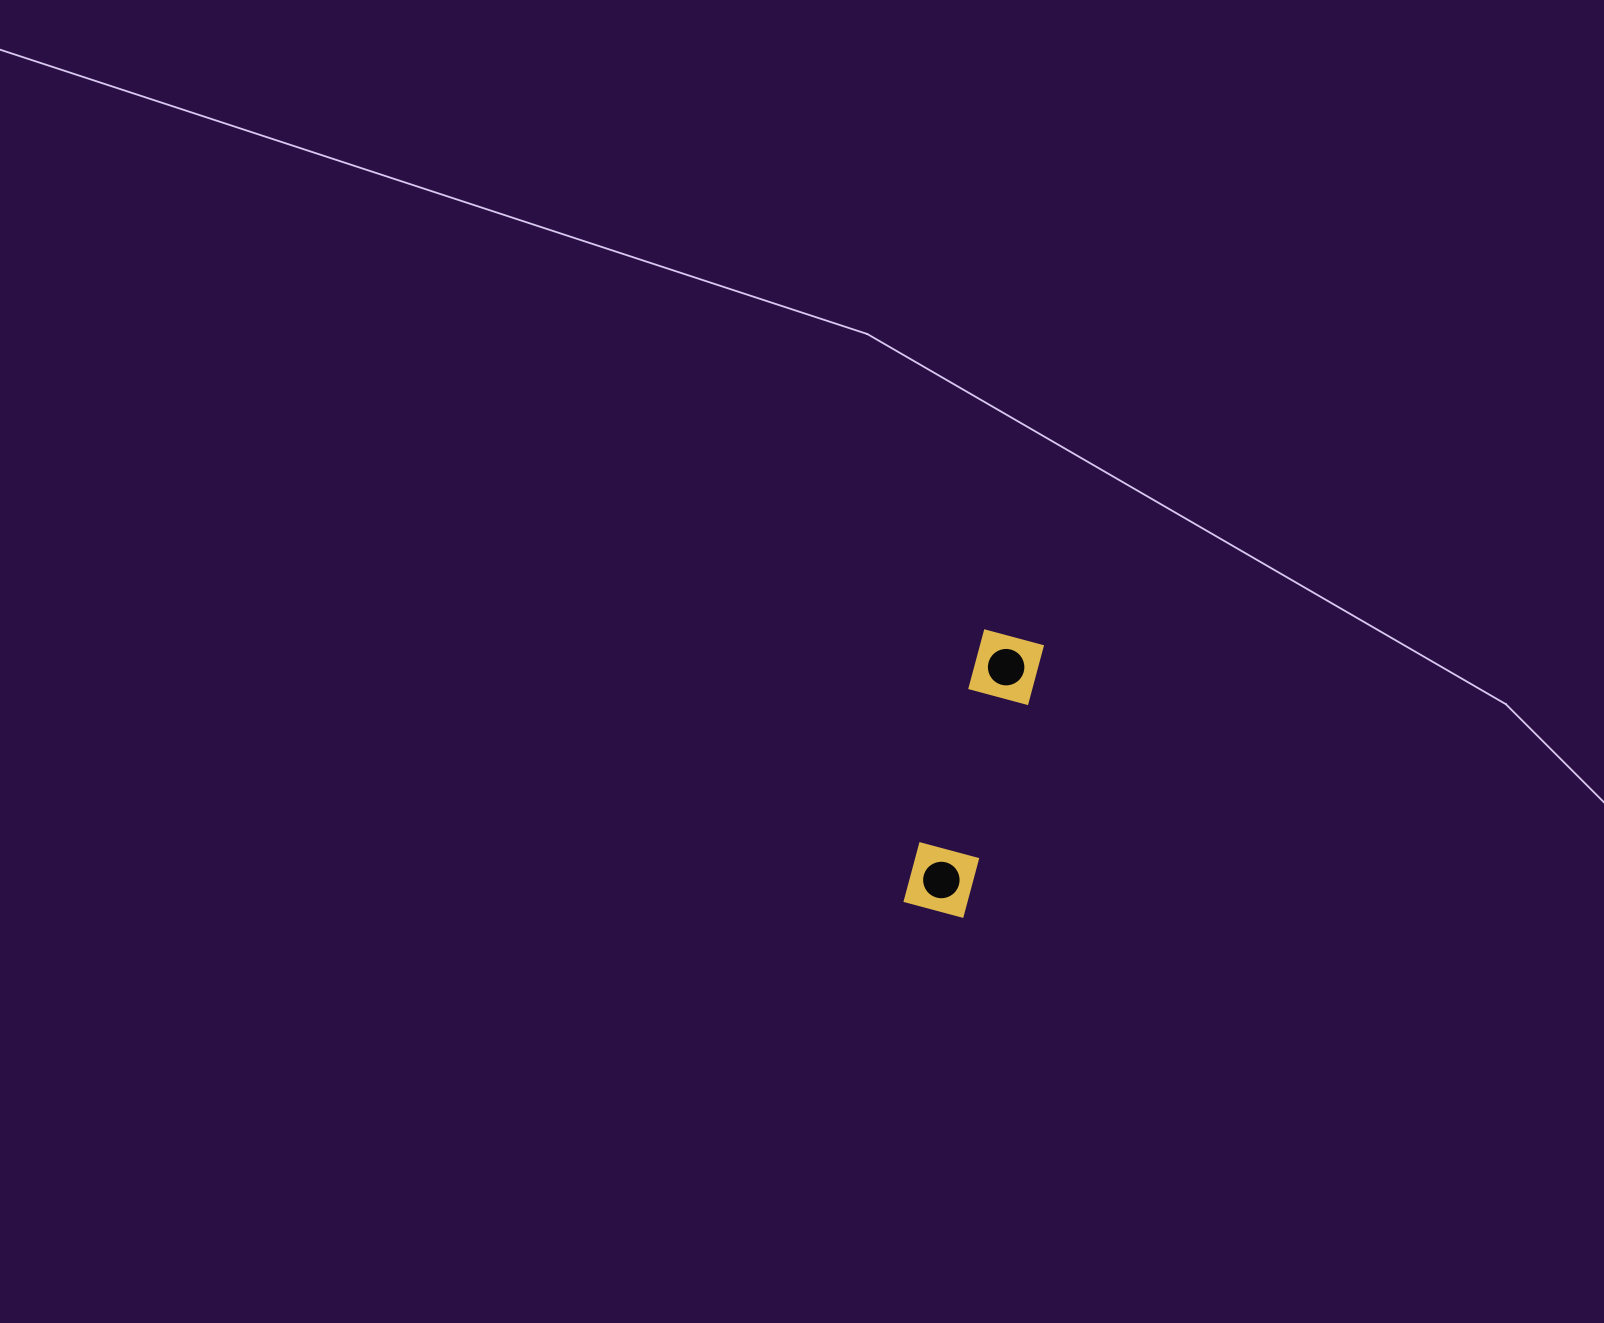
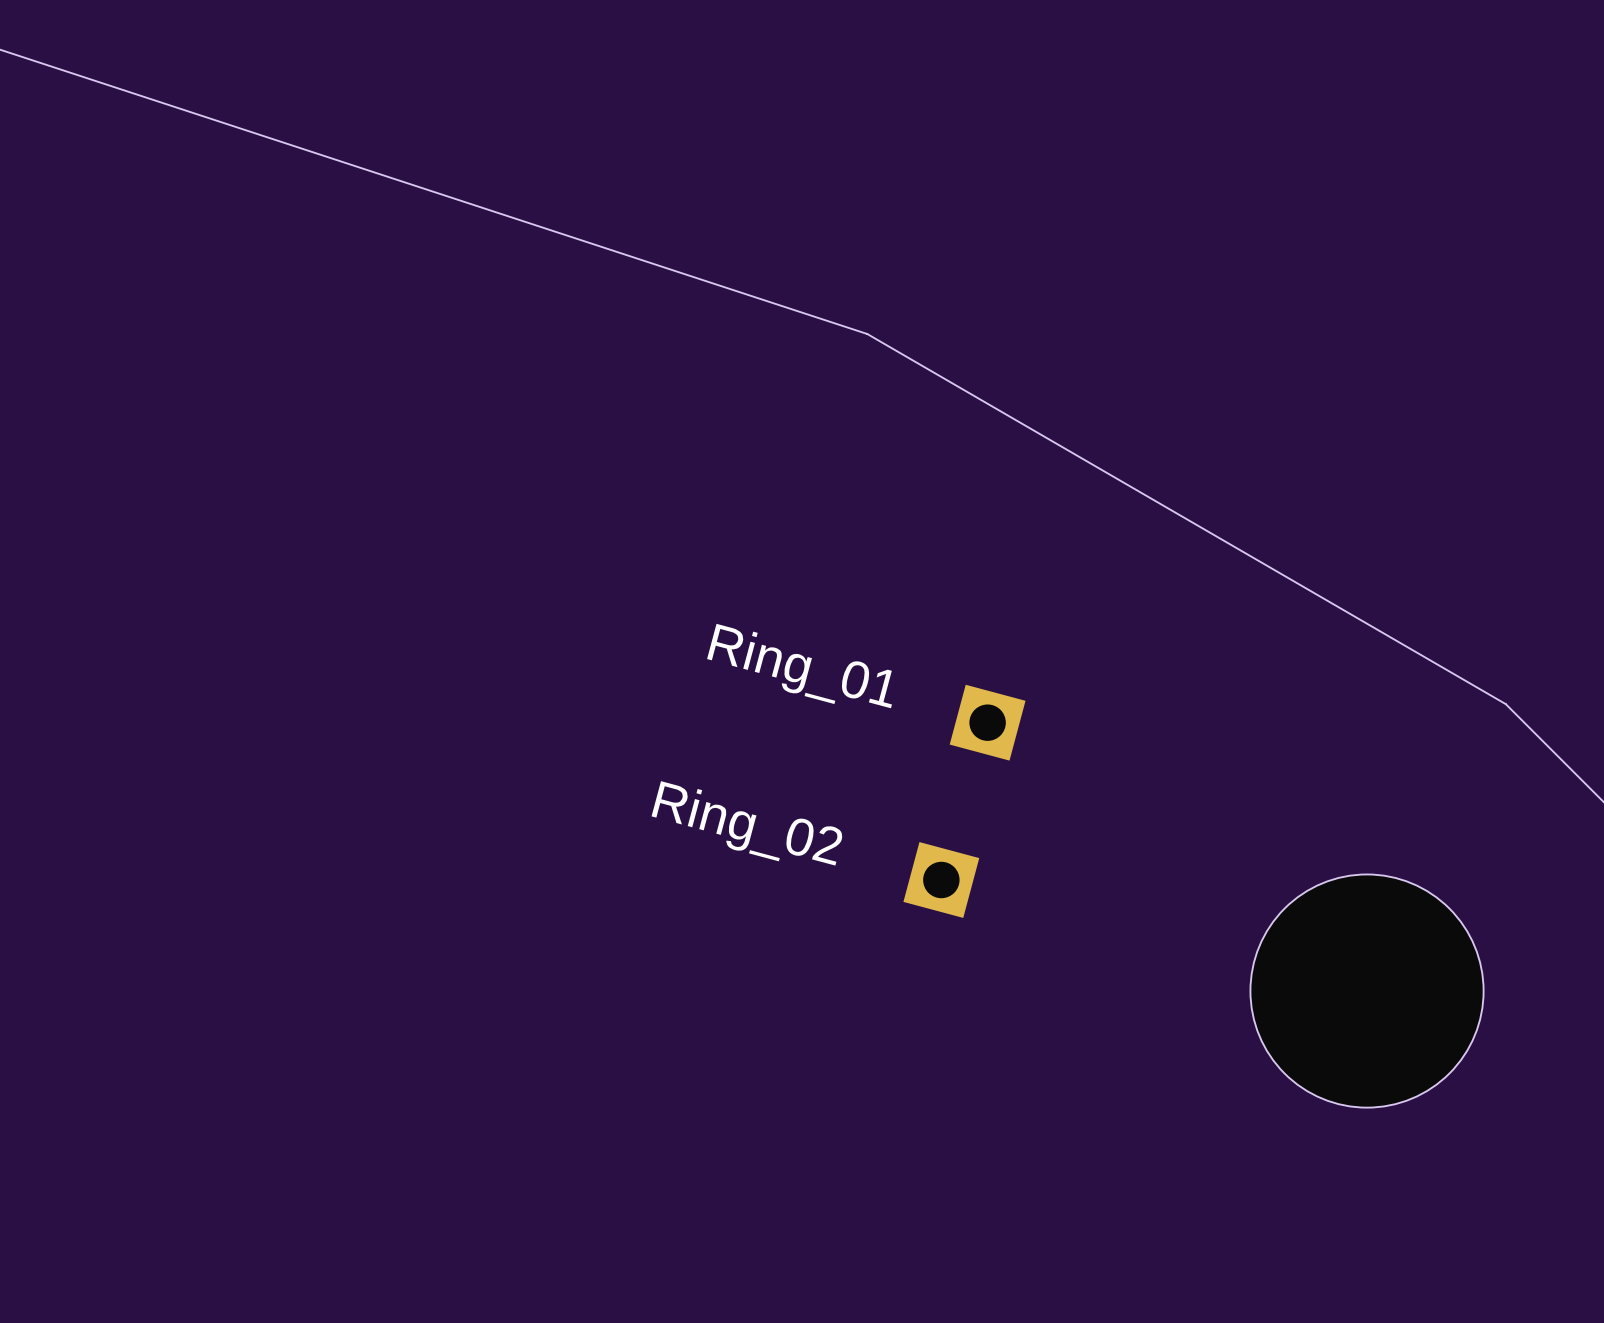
text: none -> Ring_01 (799, 666)
part position: (1006, 667) -> (987, 722)
text: none -> Ring_02 (747, 823)
part: none -> (1367, 991)

